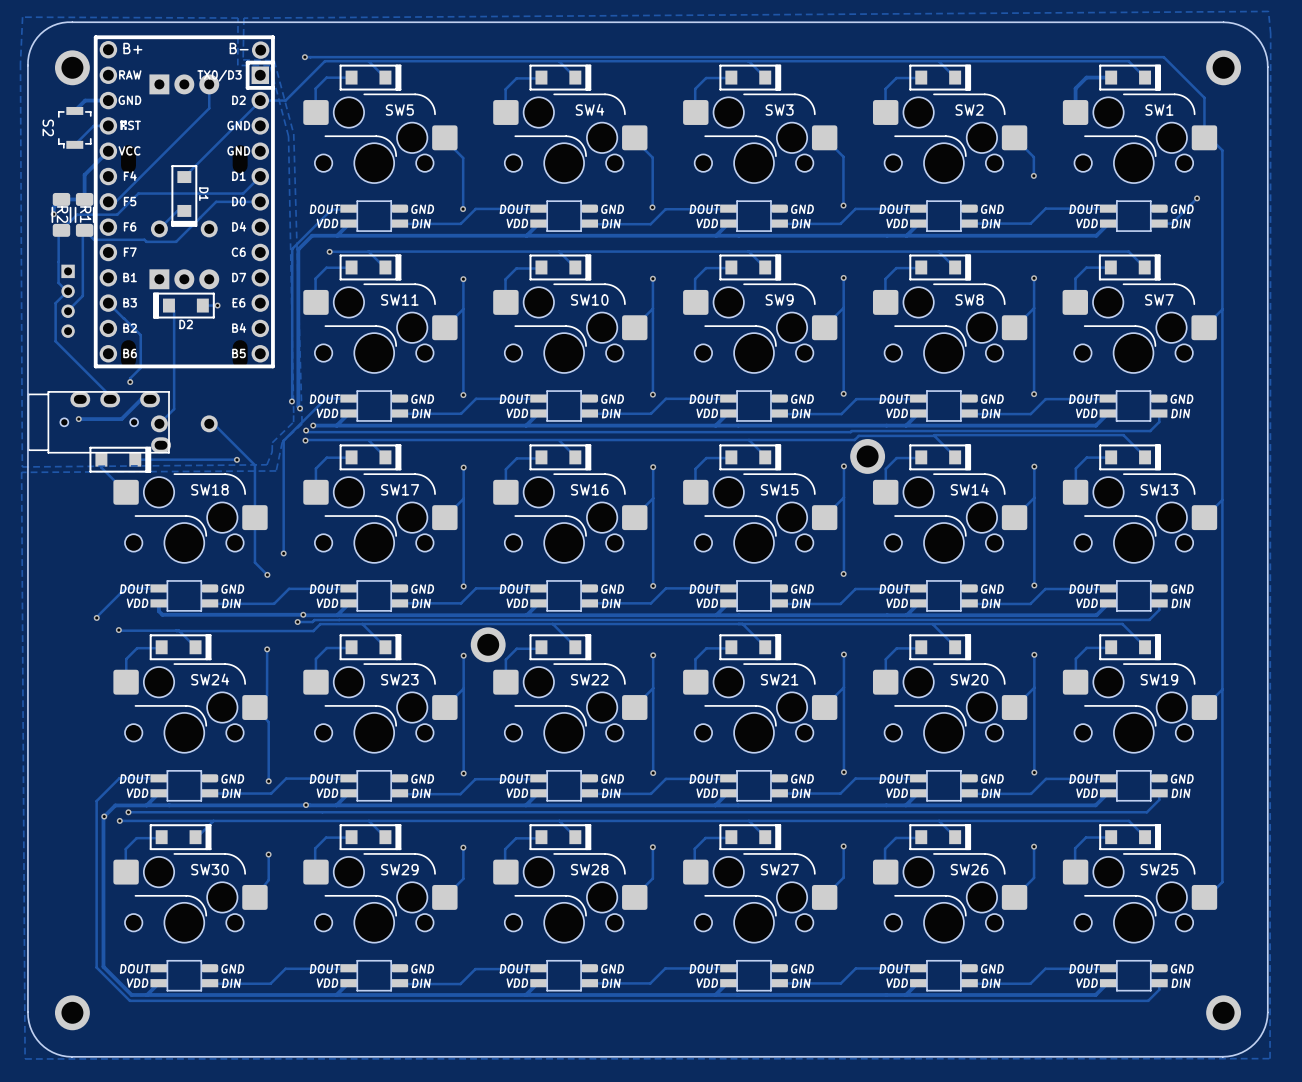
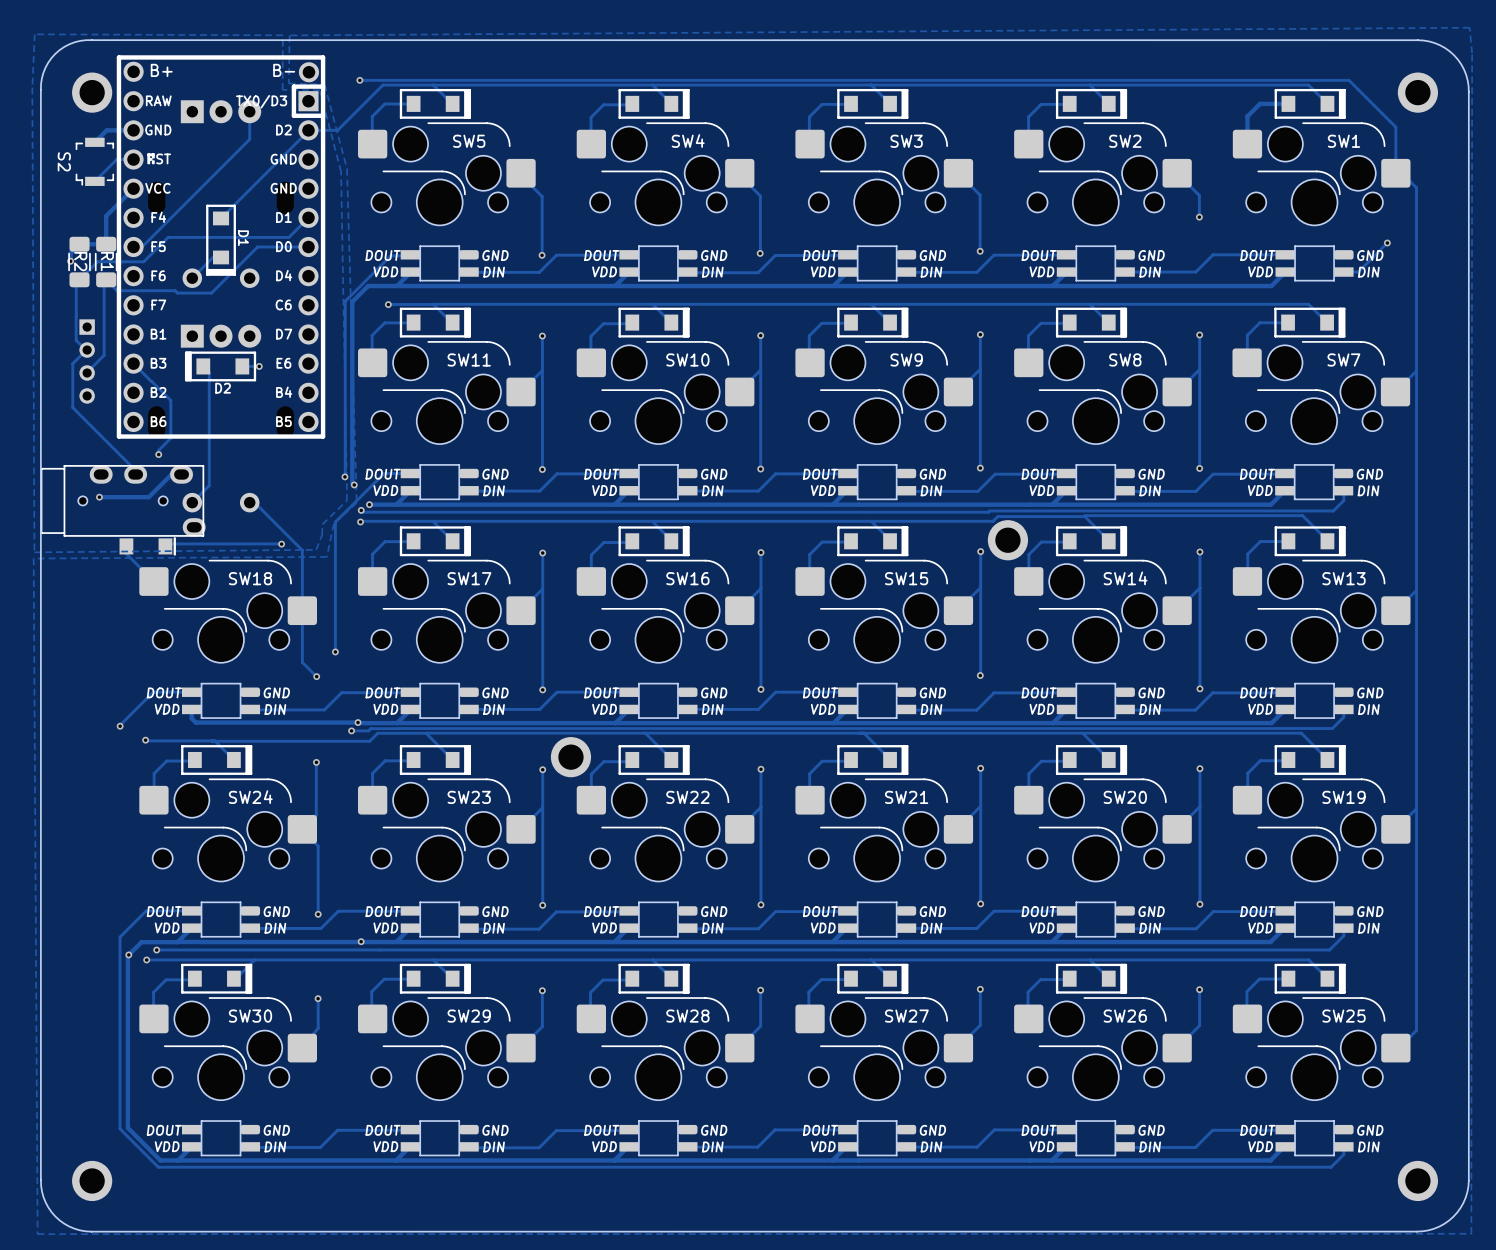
SW18 footprint: [89, 446, 268, 612] -> [119, 537, 317, 719]

